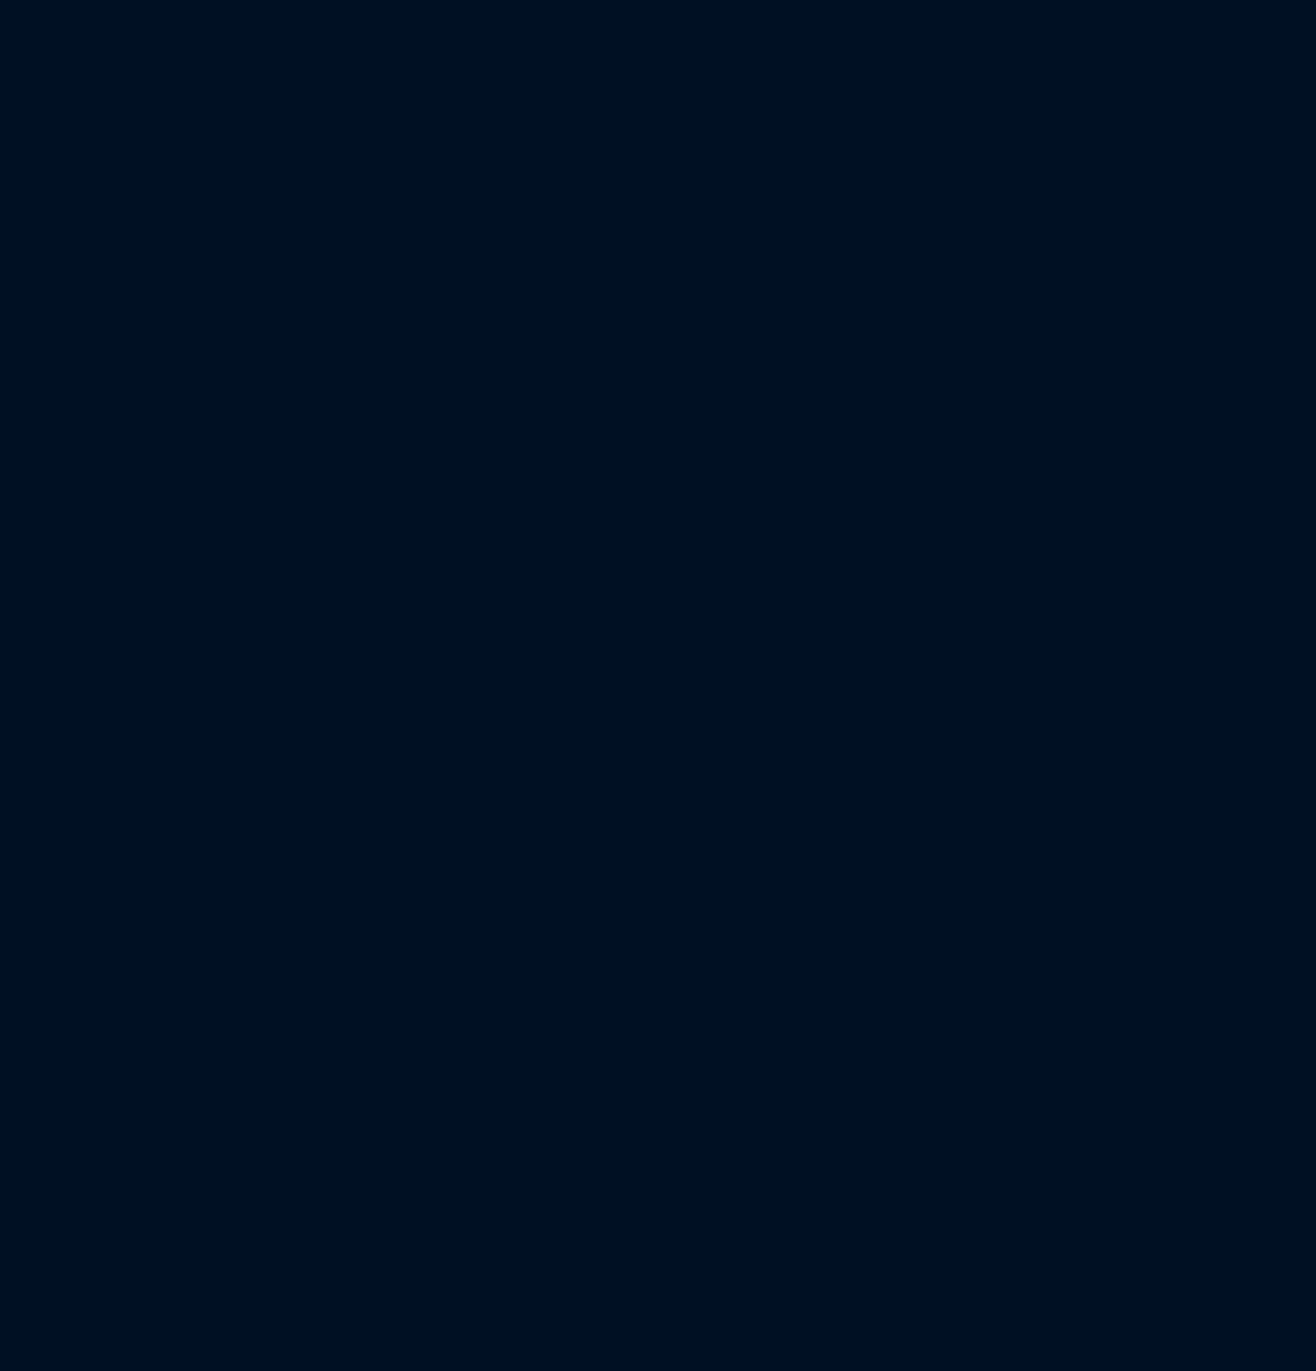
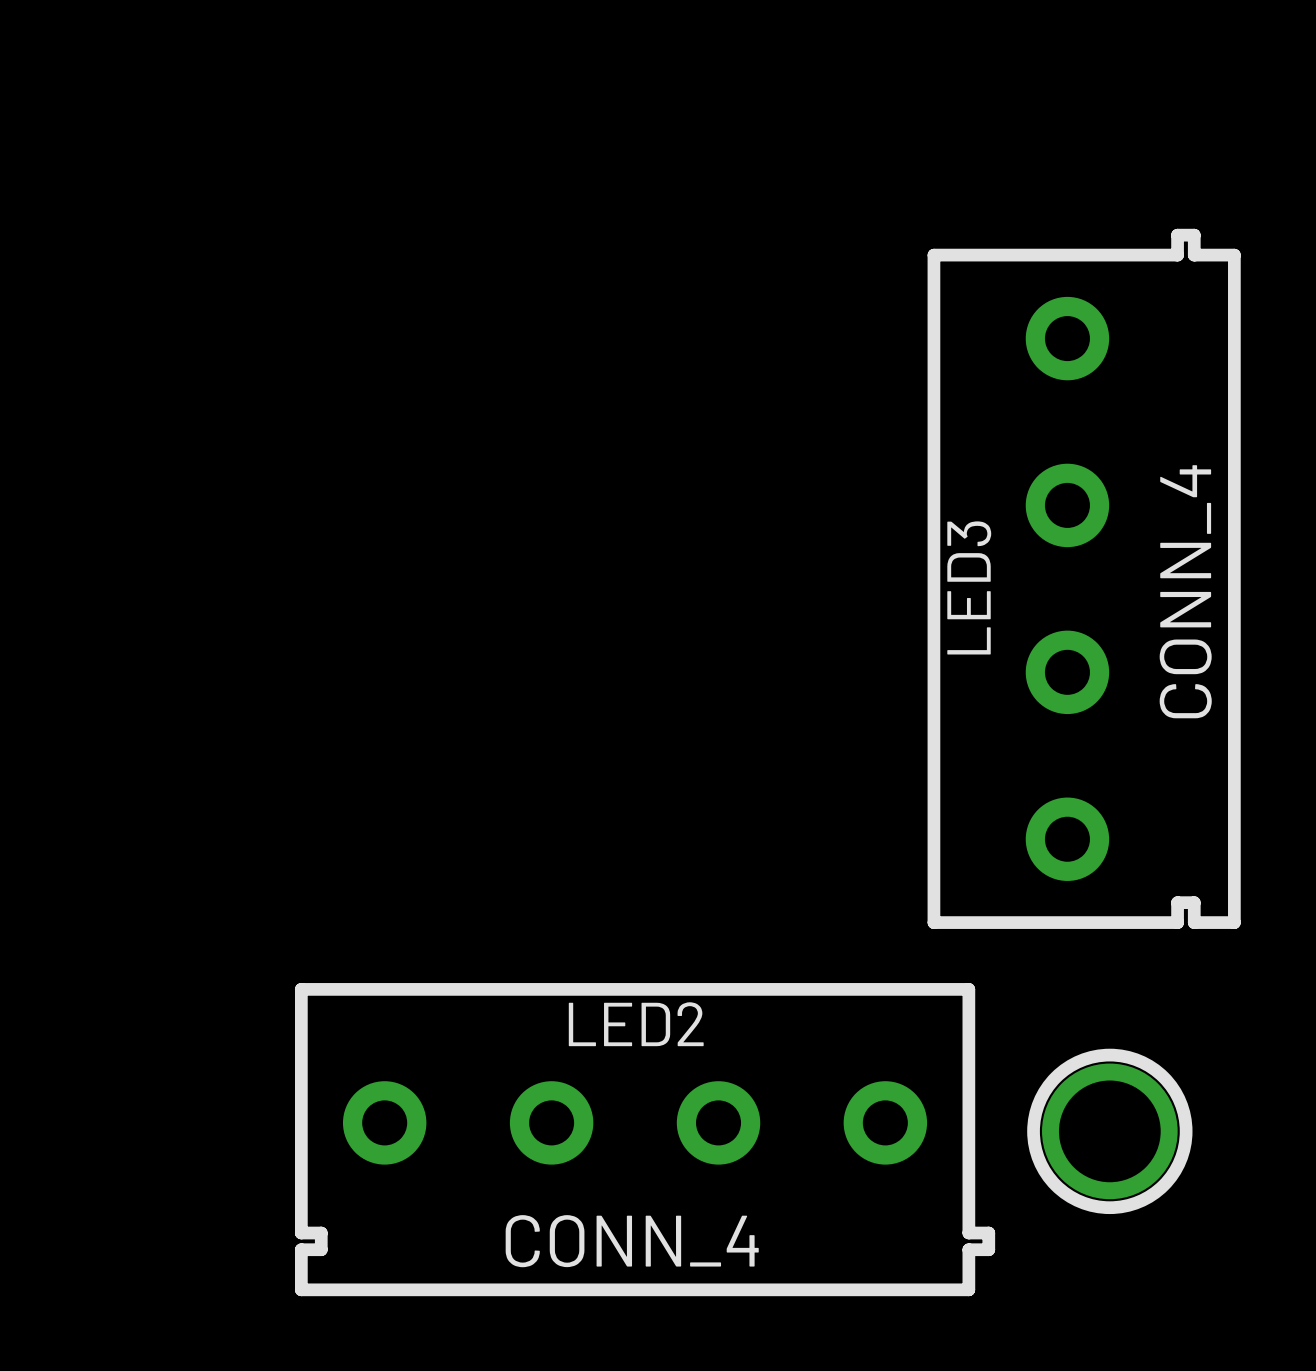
LED3: none -> CONN_4 (1084, 578)
part: none -> (1109, 1131)
LED2: none -> CONN_4 (645, 1139)

